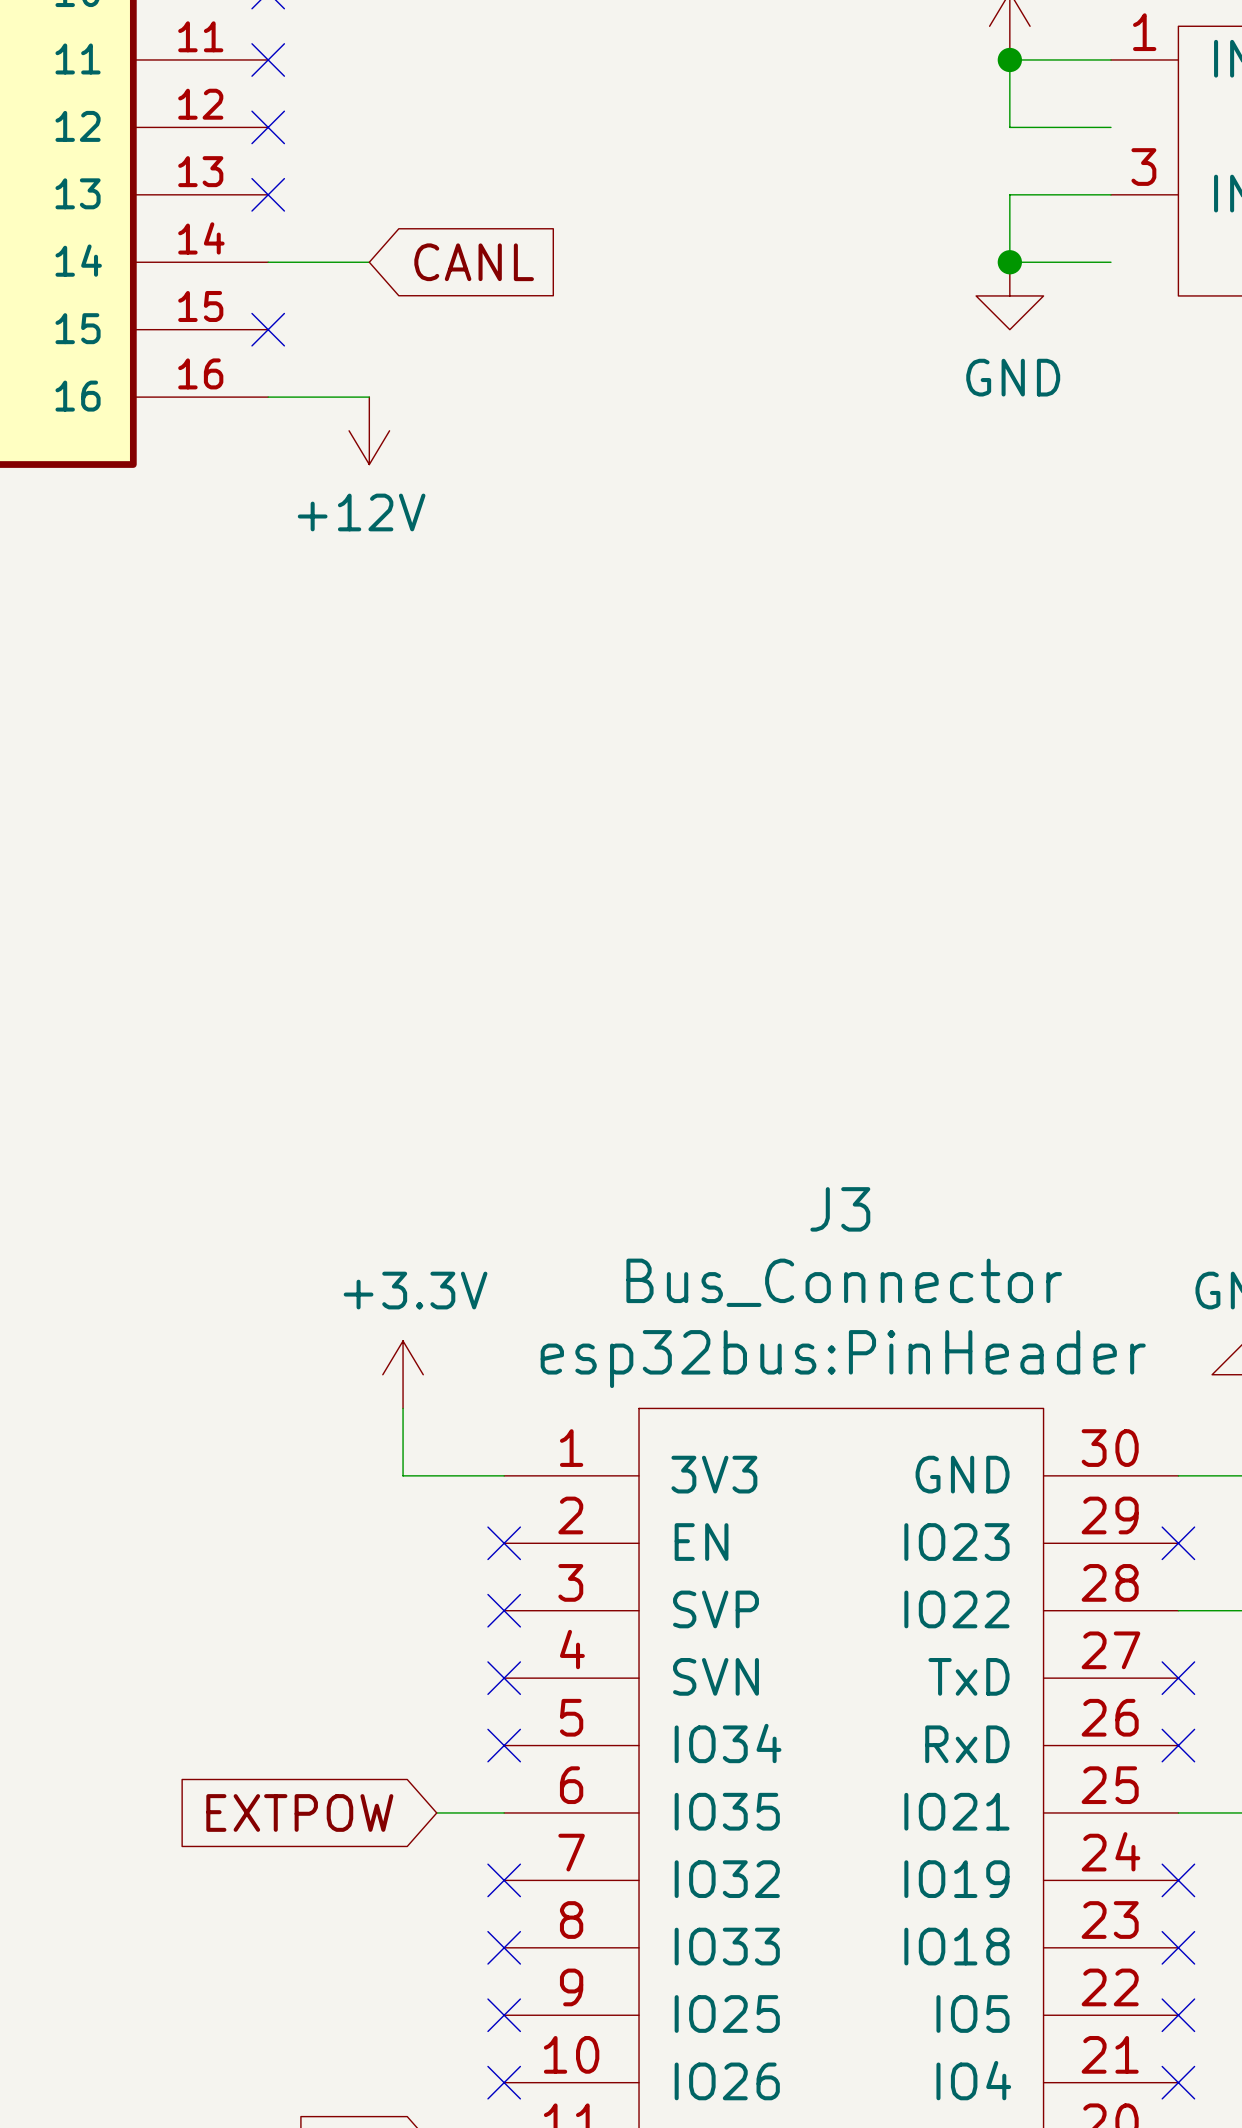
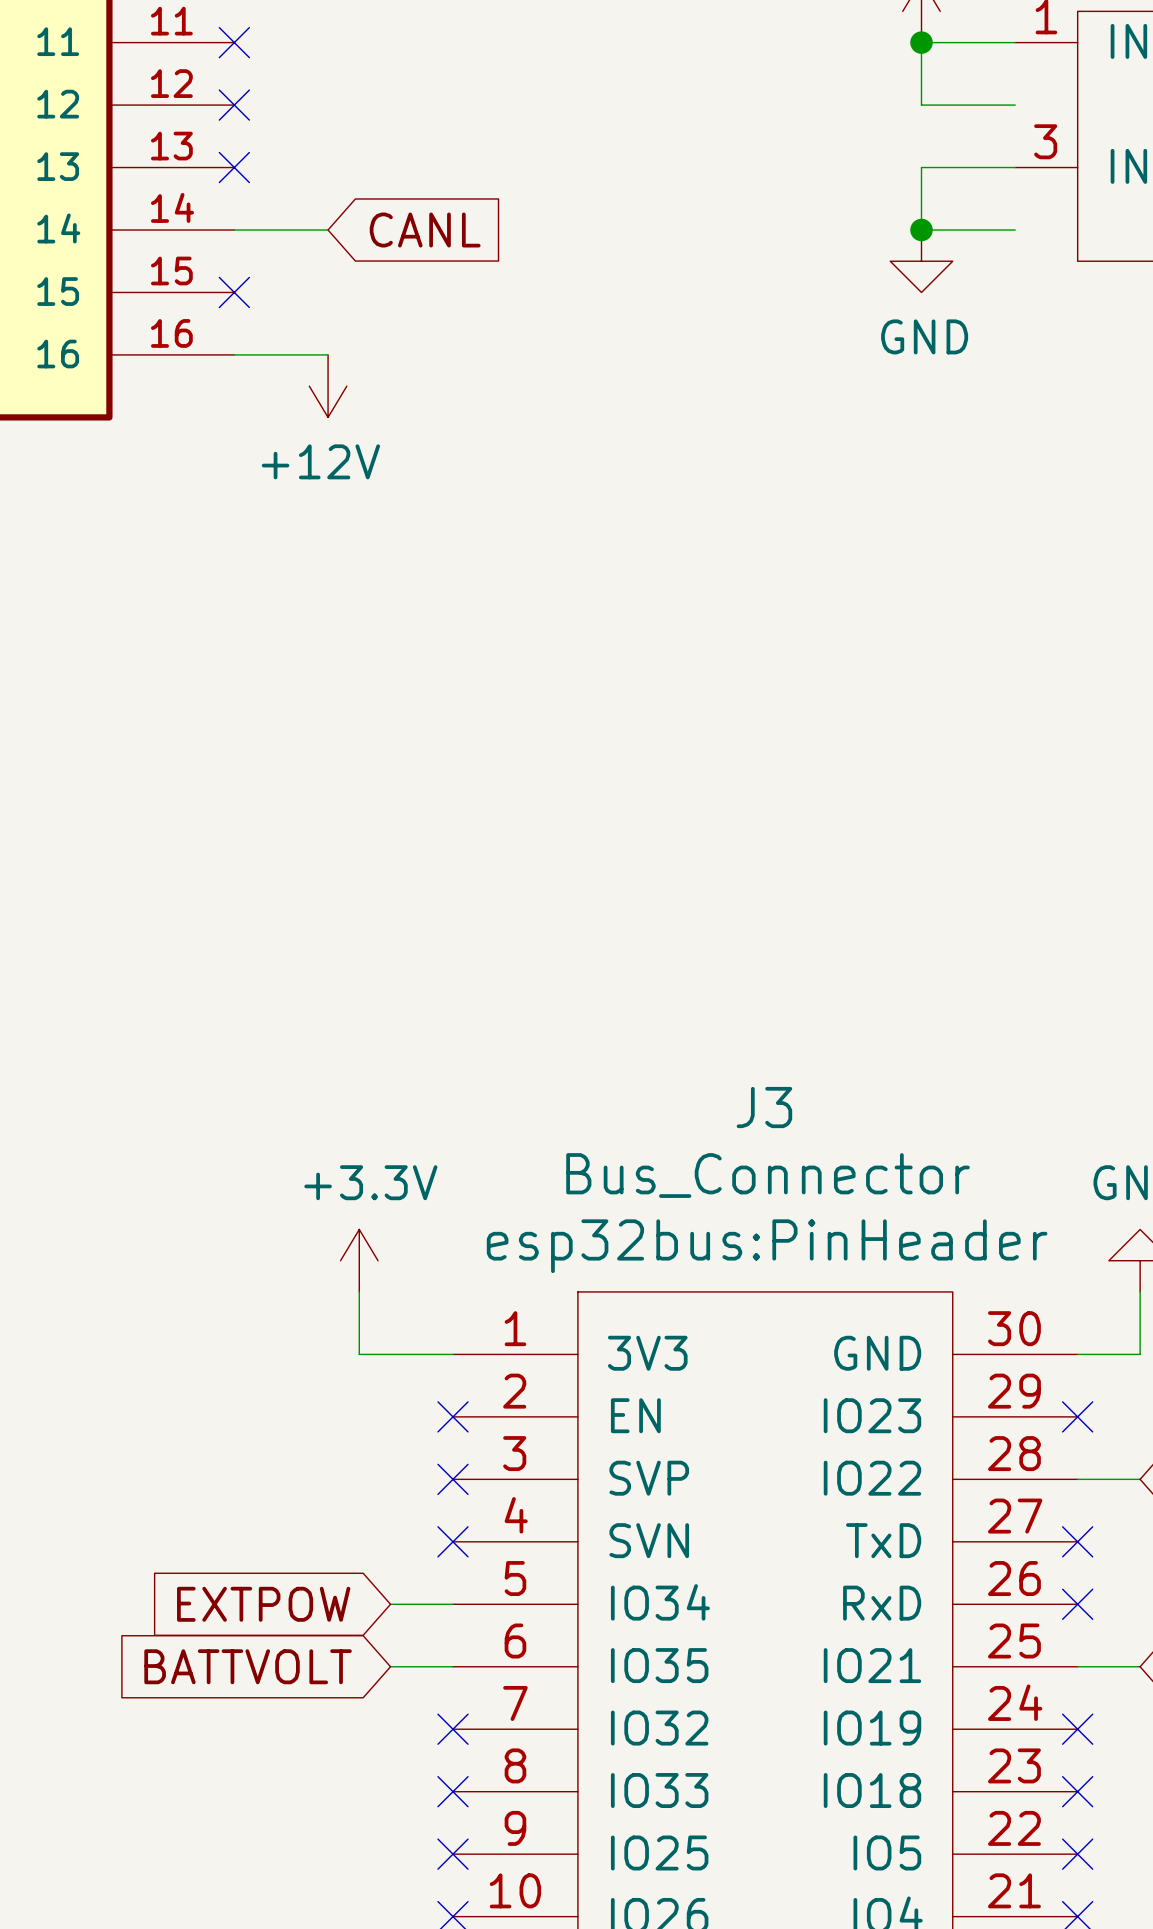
global label: none -> EXTPOW (263, 1604)
wire: none -> (390, 1604) (452, 1604)
no-connect mark: (504, 1745) -> none
global label: EXTPOW (299, 1812) -> BATTVOLT (248, 1666)

